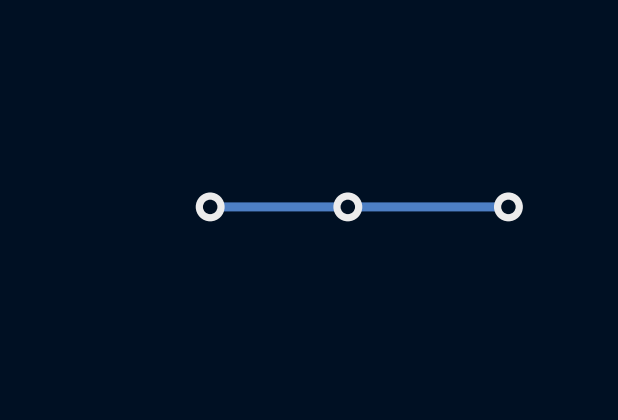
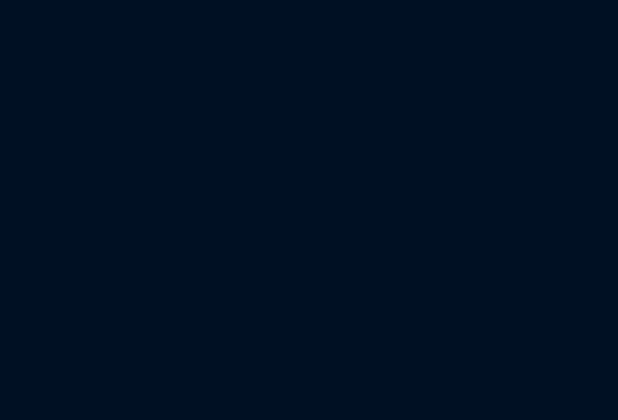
via: (210, 206) -> none
via: (347, 206) -> none
track: (508, 206) (210, 206) -> none
via: (508, 206) -> none

